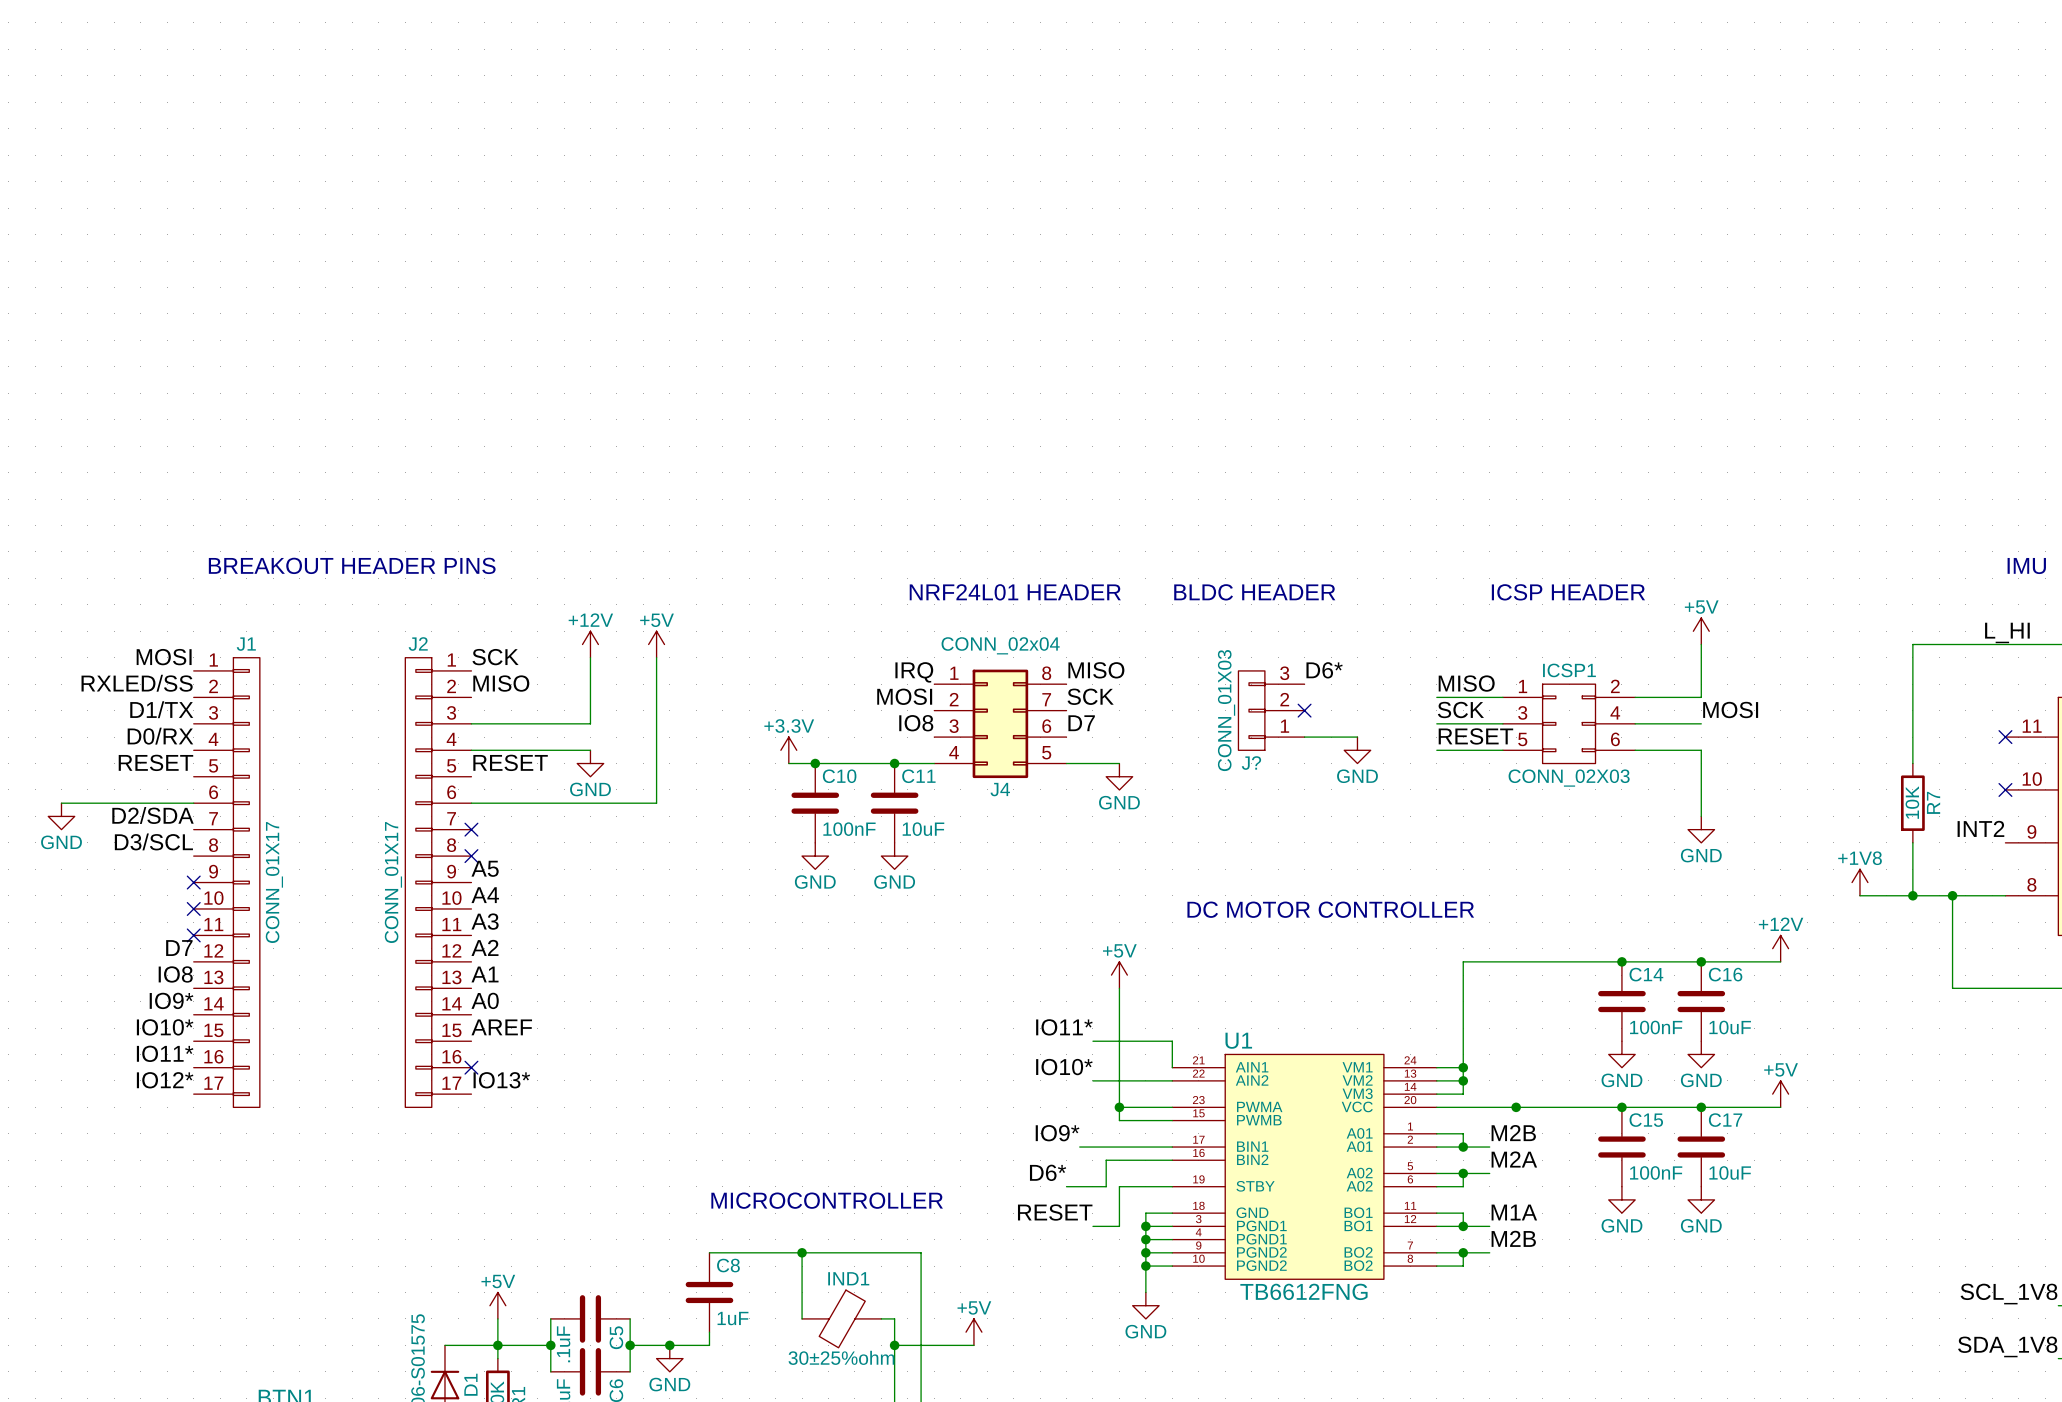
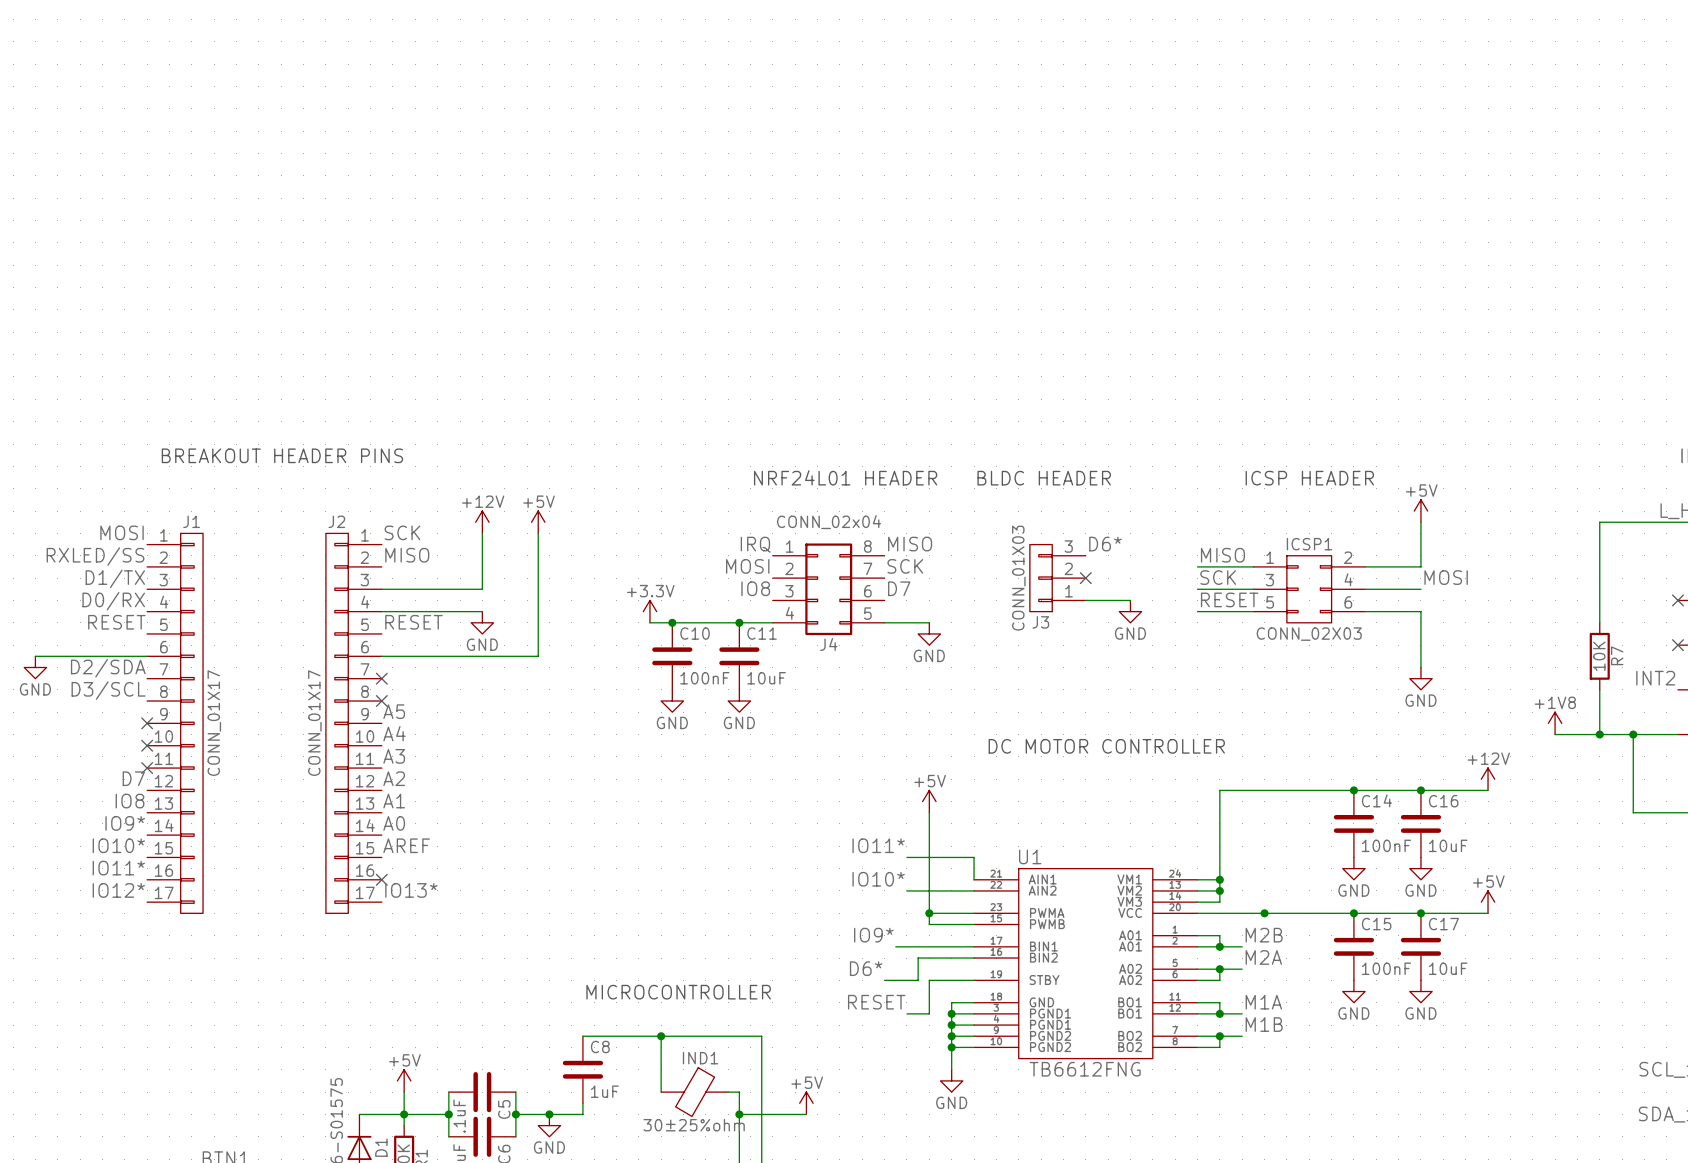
J? name: J? (1251, 763) -> J3 (1040, 622)
label: M2B (1513, 1238) -> M1B (1264, 1024)

